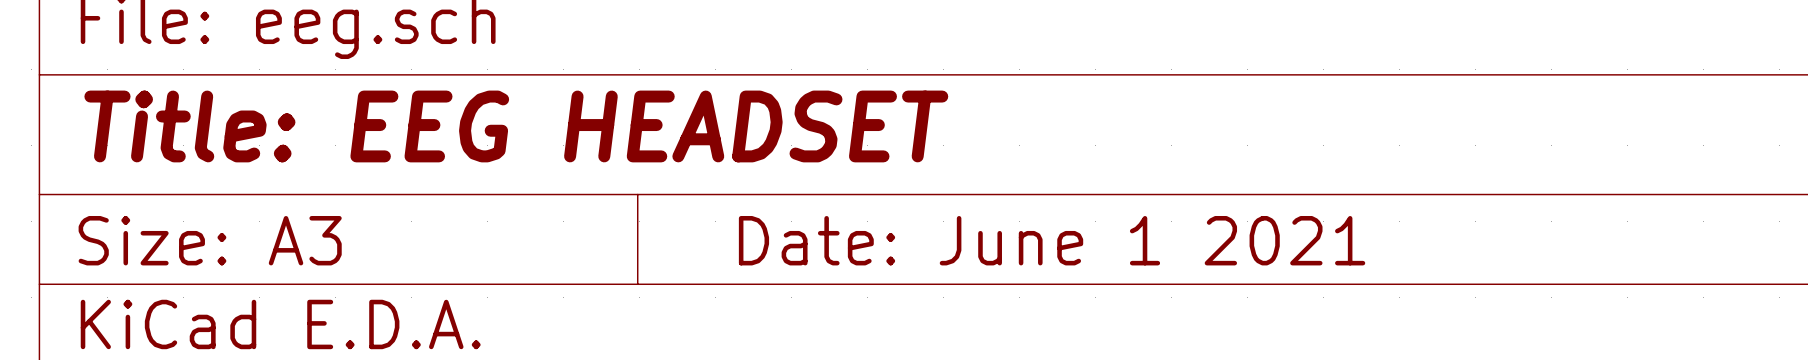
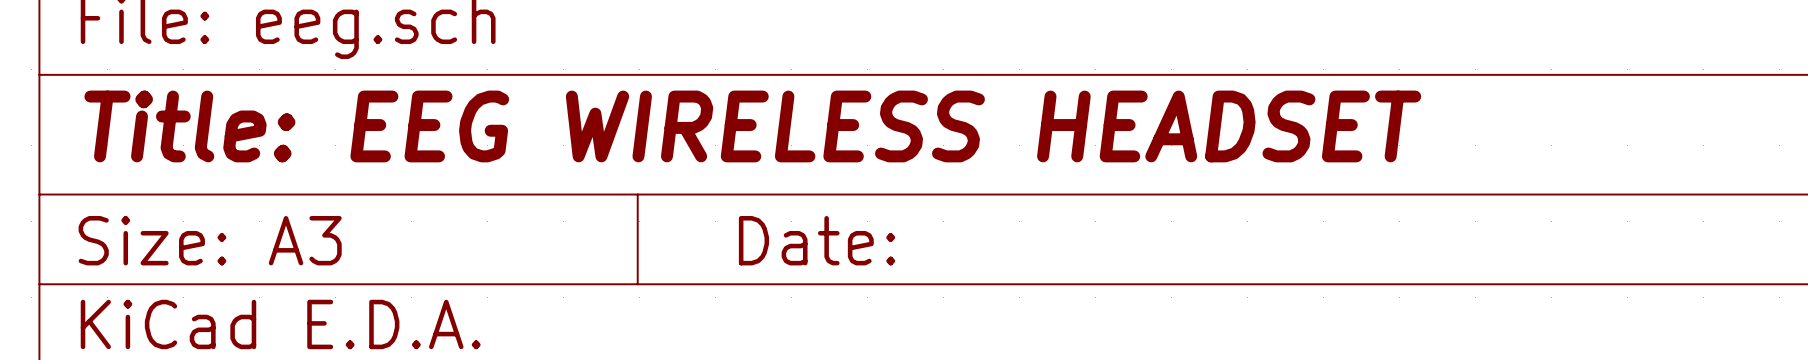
title block: Title: EEG HEADSET (516, 126) -> Title: EEG WIRELESS HEADSET (752, 126)
title block: Date: June 1 2021 (1052, 240) -> Date: (817, 240)

